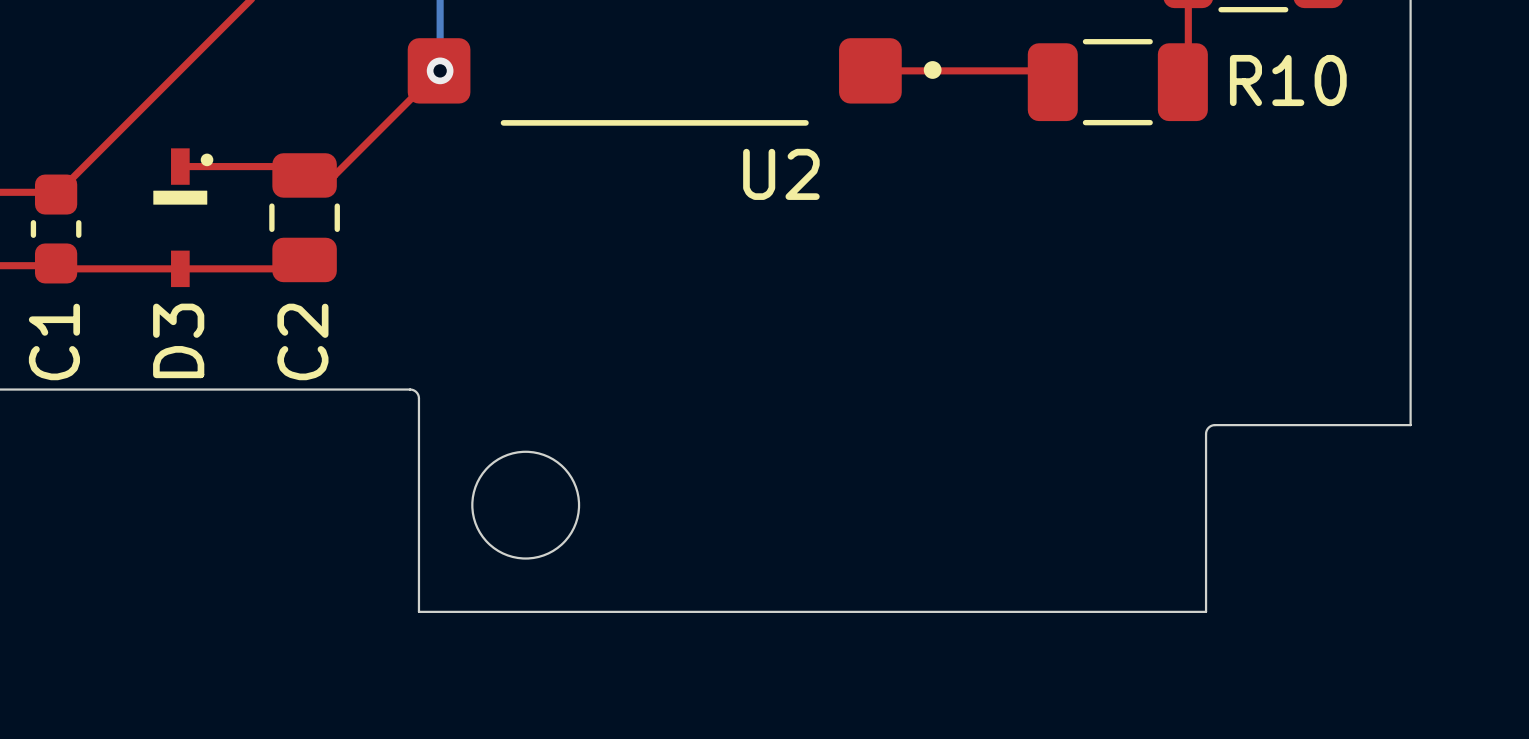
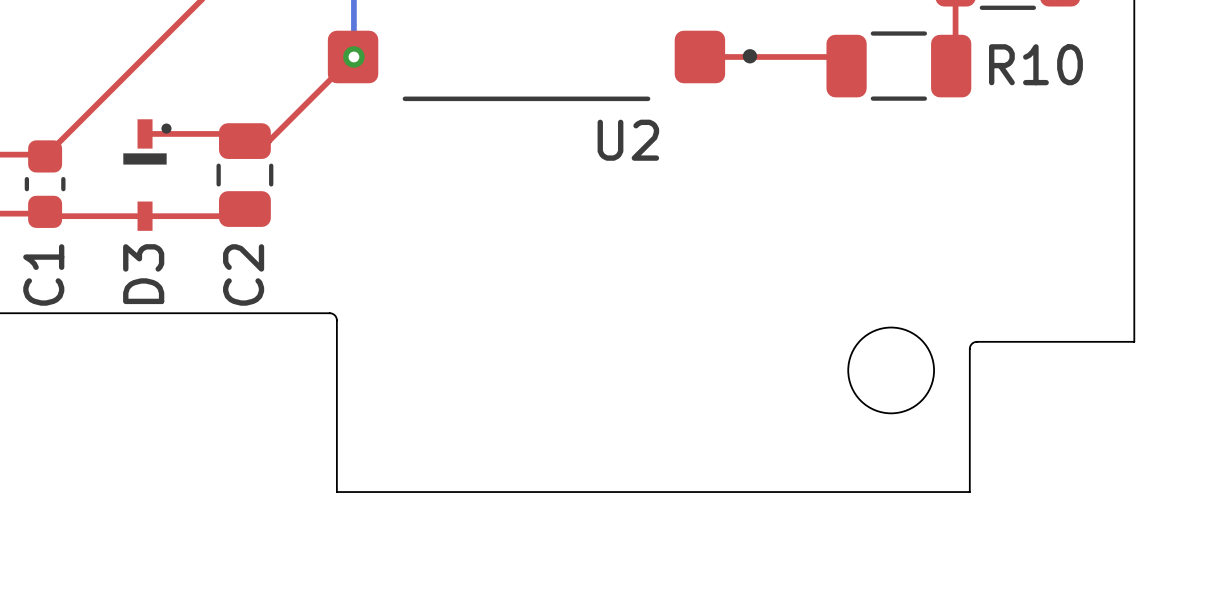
round board edge position: (525, 505) -> (891, 370)

